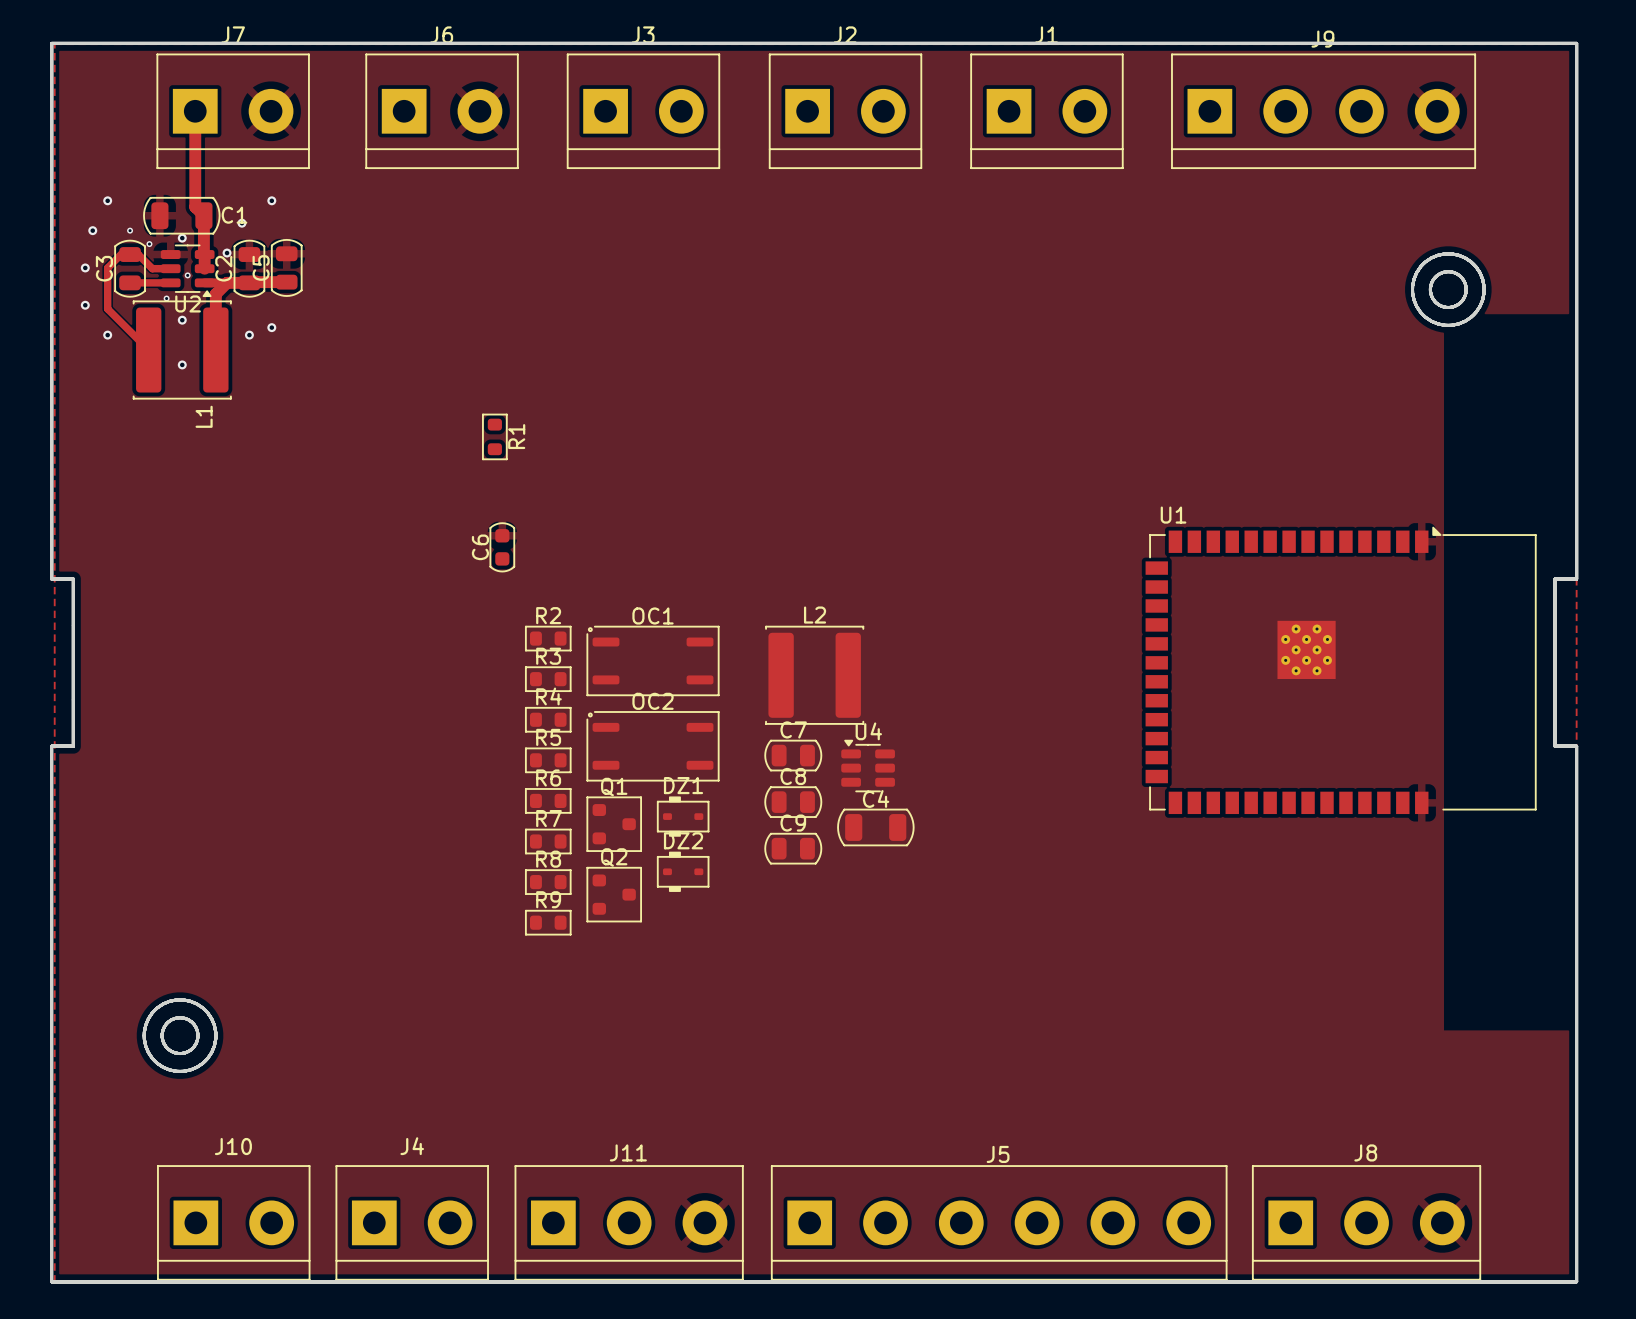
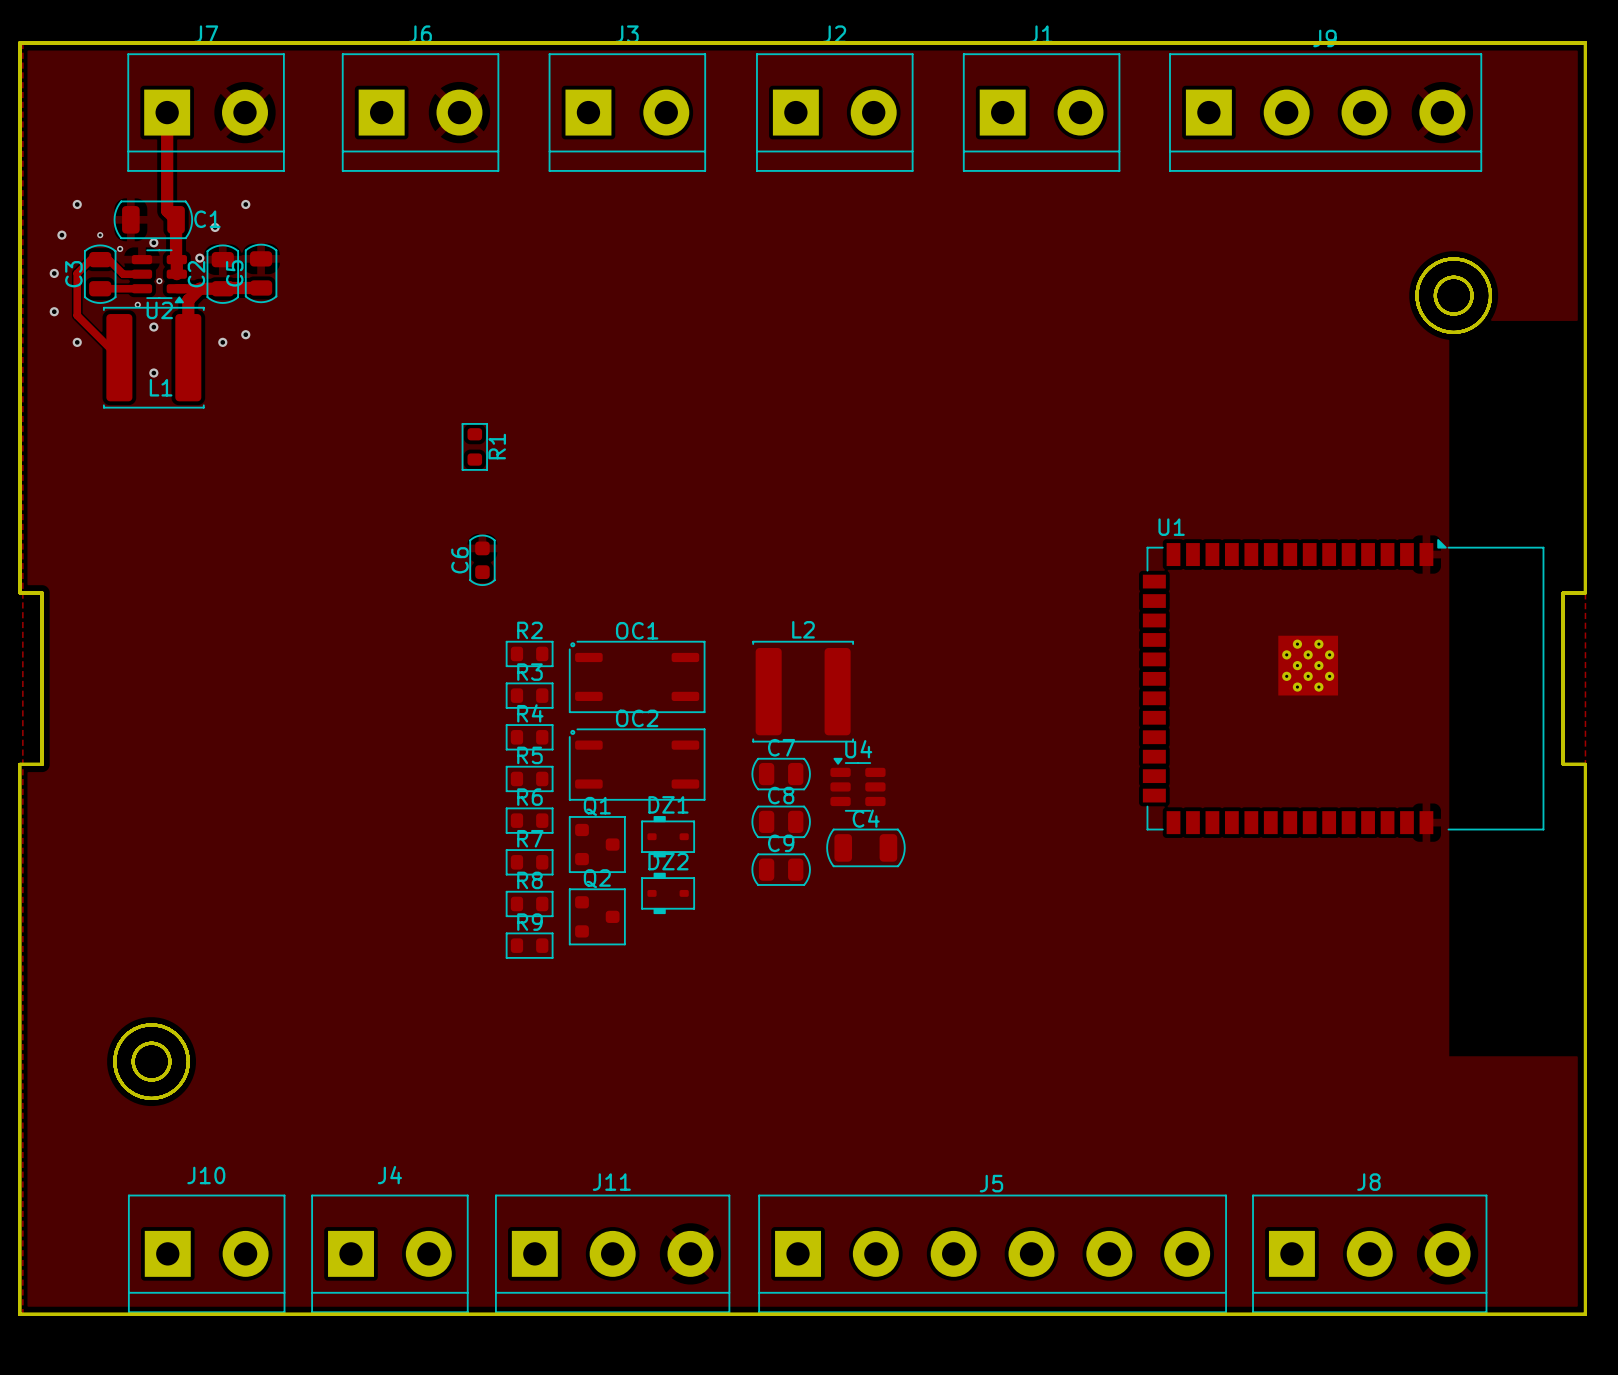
L1 name rotation: 0° (204, 416) -> 90° clockwise (161, 387)
L1 name position: L1 (204, 416) -> L1 (161, 387)

